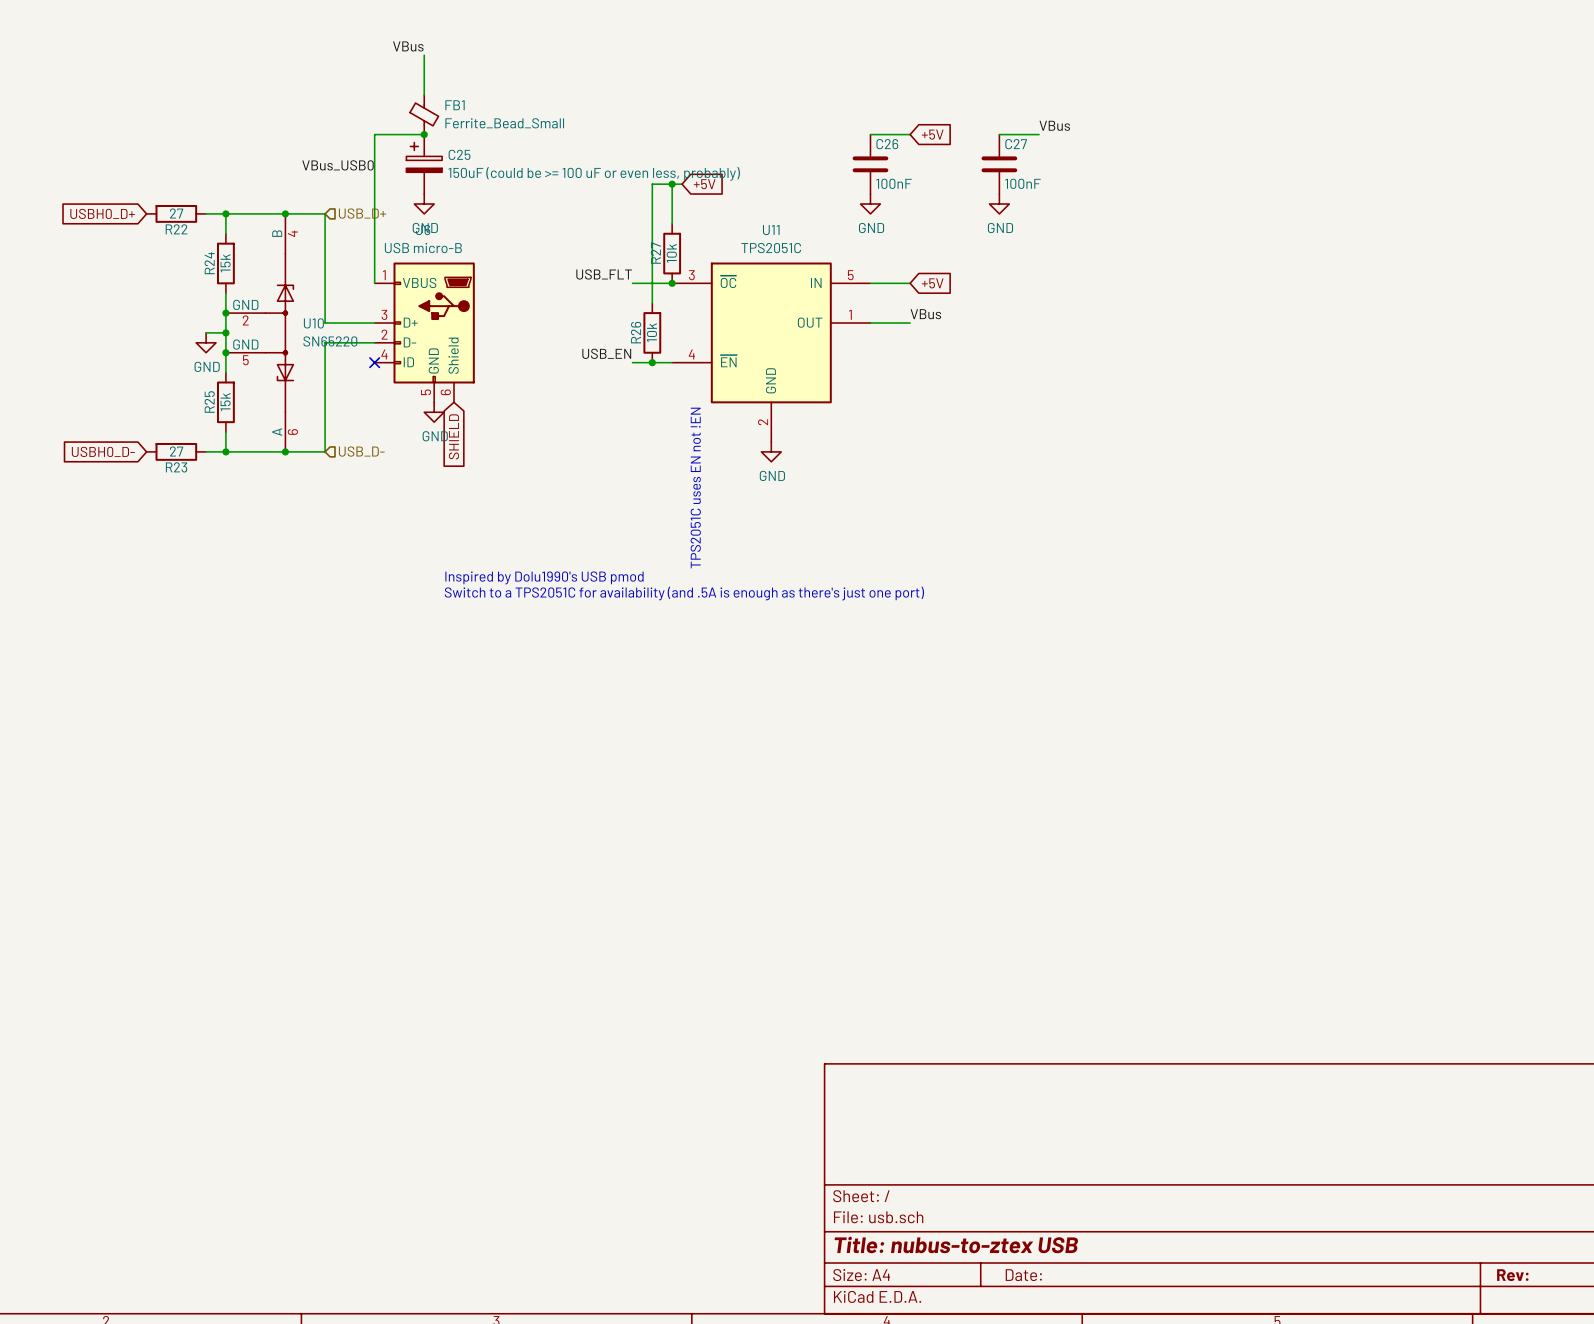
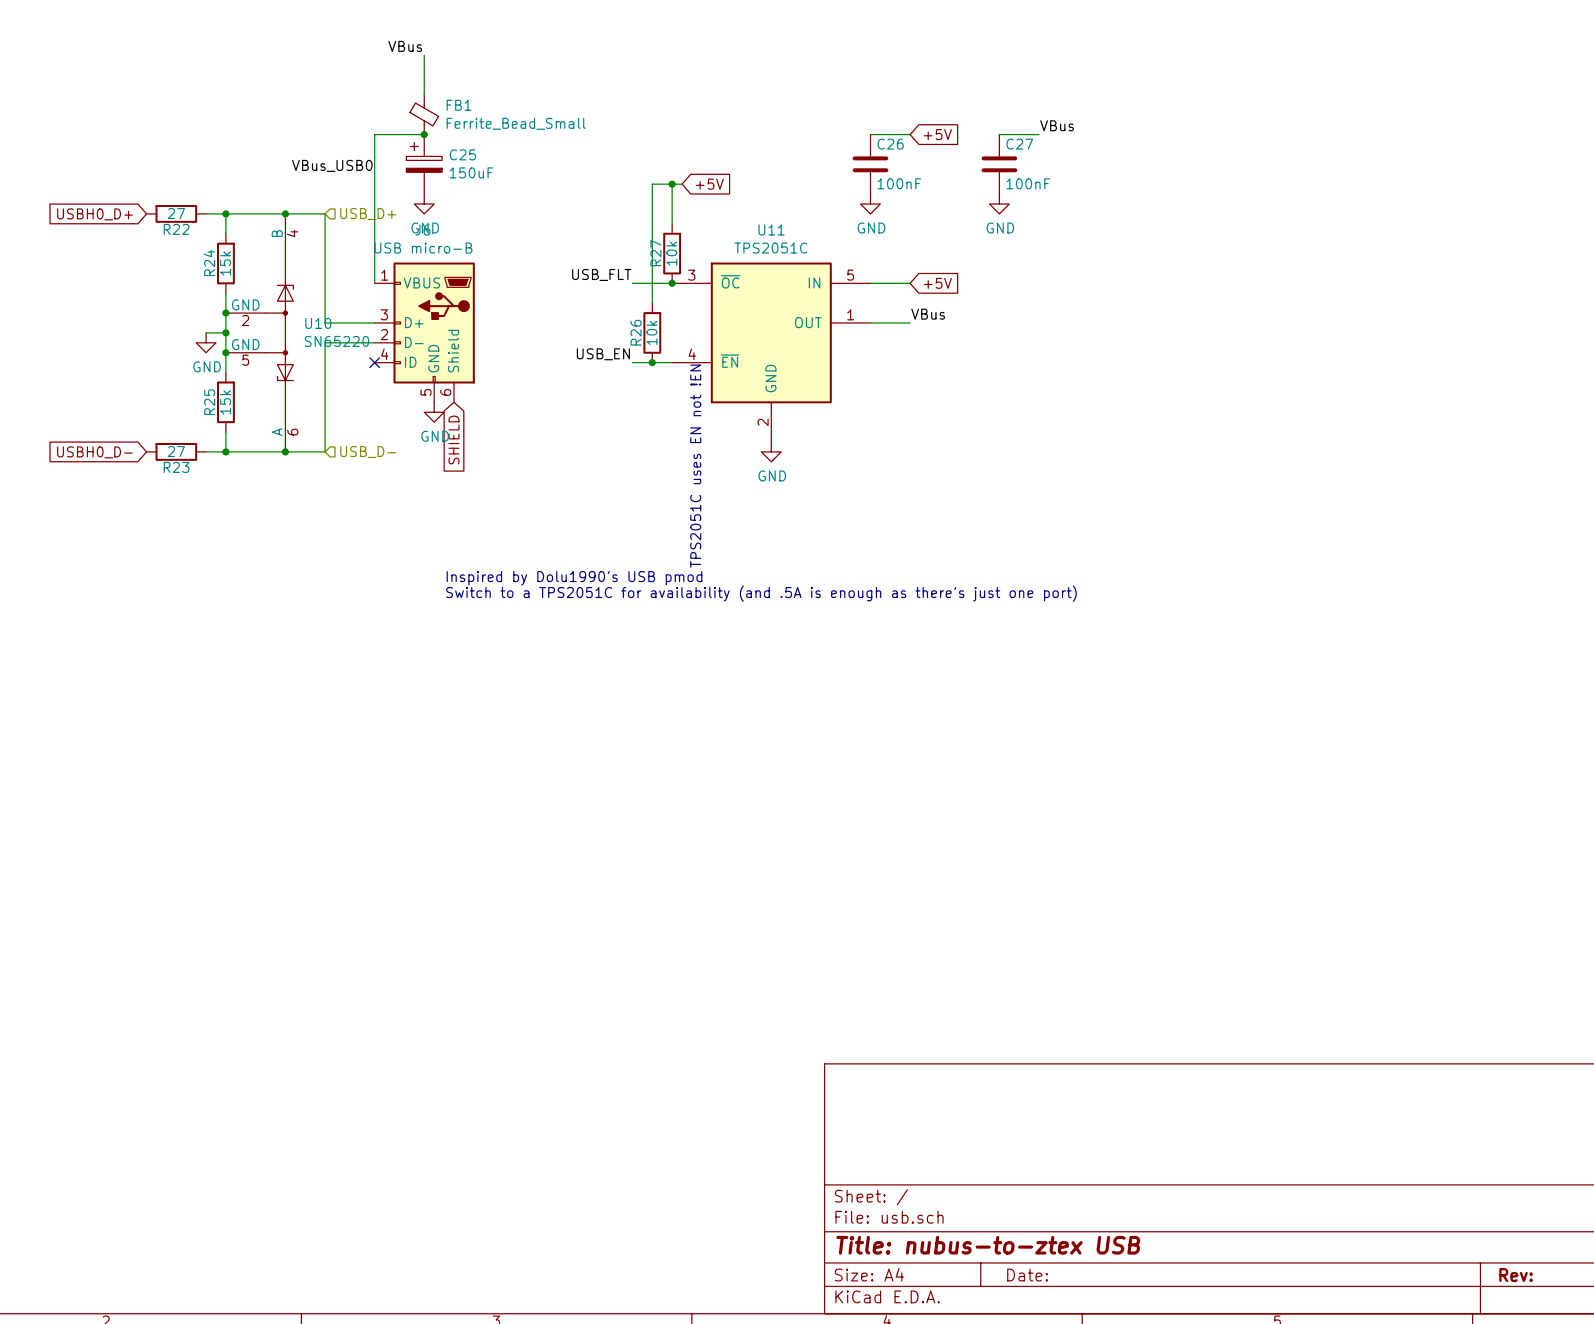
C25 value: 150uF (could be >= 100 uF or even less, probably) (594, 173) -> 150uF (471, 172)

